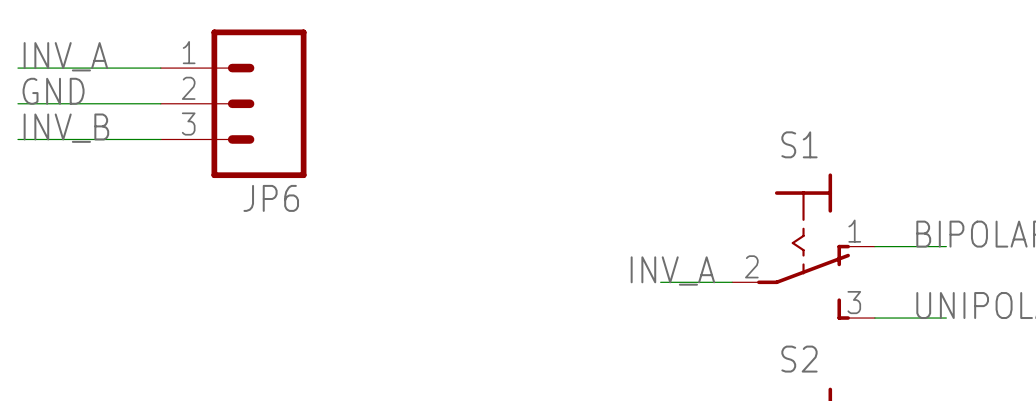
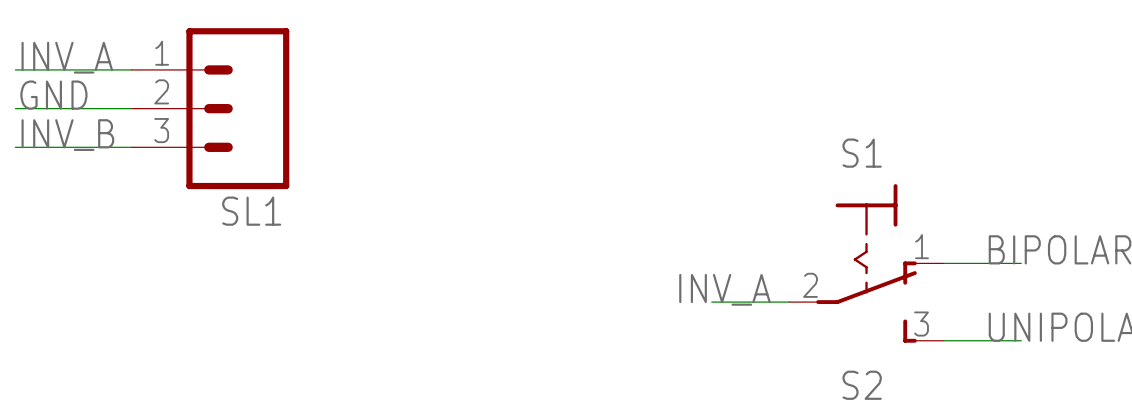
SL1: none -> (210, 108)
JP6: (233, 103) -> none

